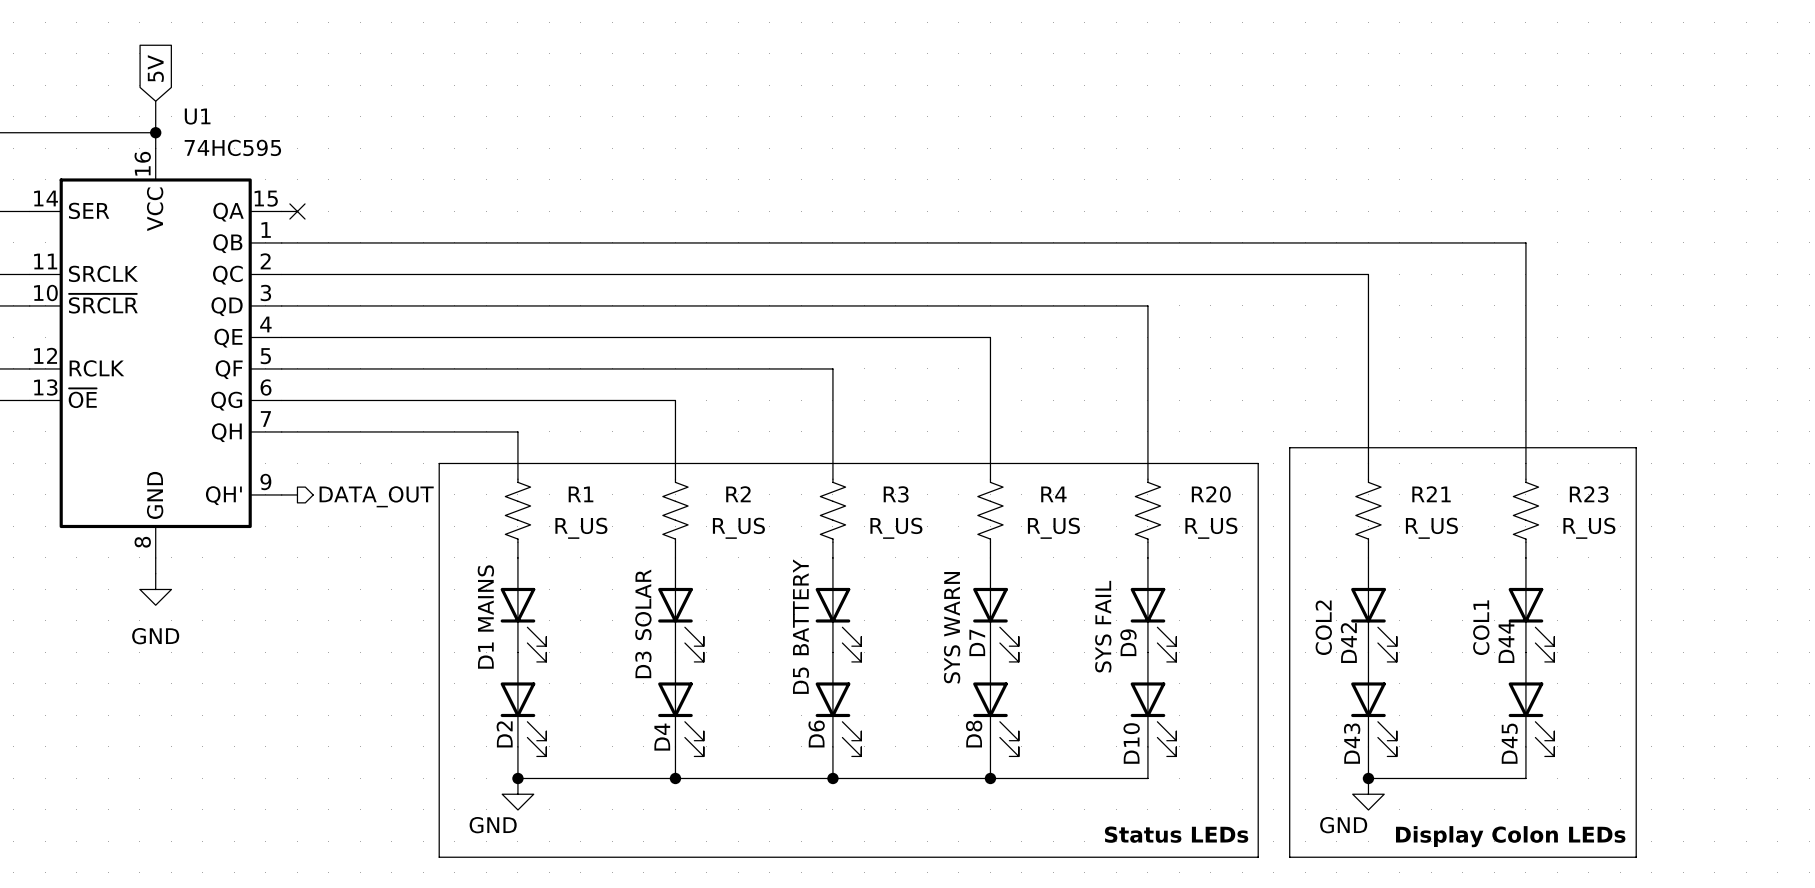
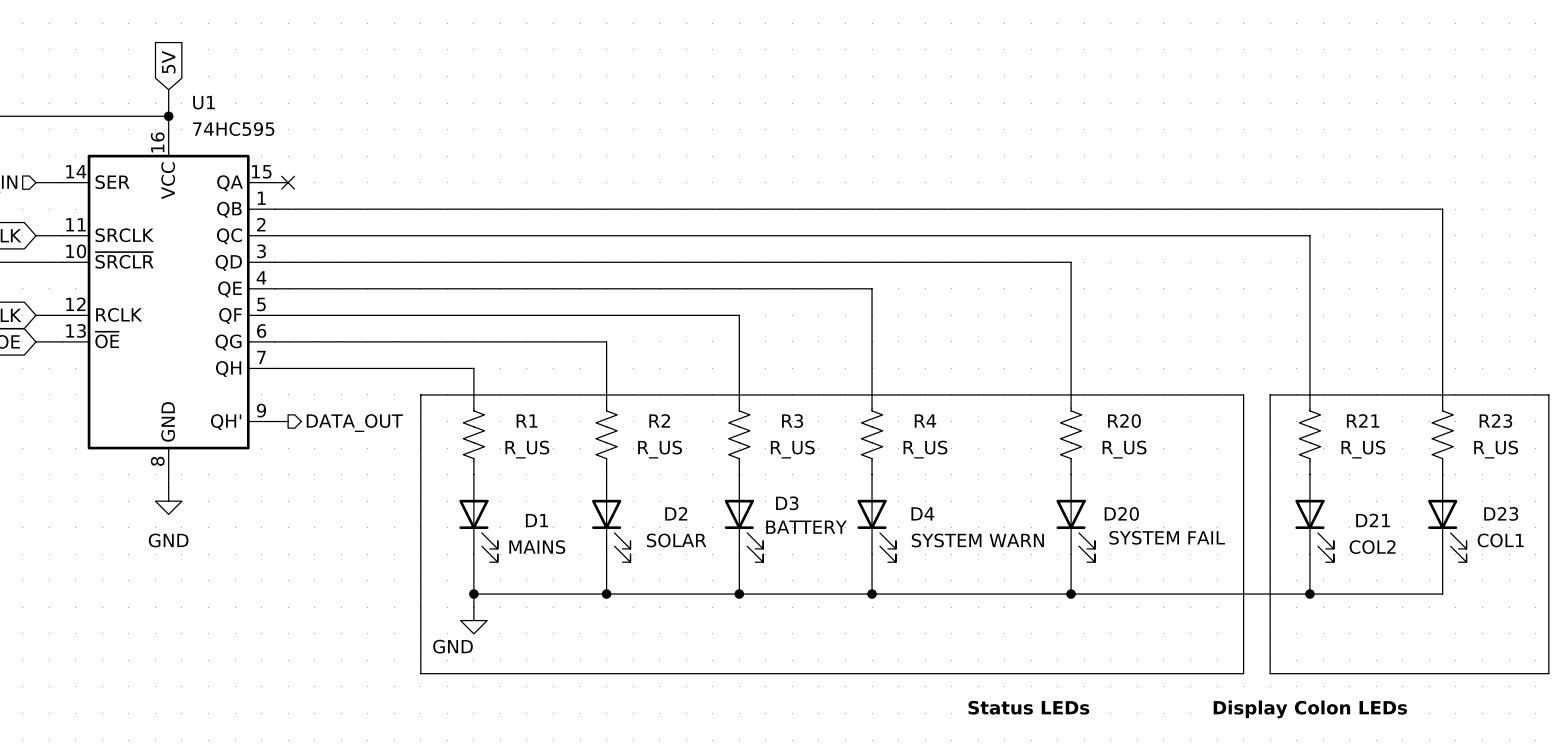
wire: (1525, 242) (1525, 463) -> (1323, 209) (1442, 209) (1442, 394)
wire: (1368, 274) (1368, 463) -> (1190, 235) (1309, 235) (1309, 394)
wire: (1147, 305) (1147, 463) -> (1004, 262) (1071, 262) (1071, 394)
line: (1289, 447) (1636, 447) (1636, 857) (1289, 857) (1289, 447) -> none
line: (454, 463) (439, 463) (439, 857) (1258, 857) (1258, 463) -> (420, 394) (420, 673) (1243, 673) (1243, 394) (1097, 394)
line: none -> (1270, 394) (1548, 394) (1548, 673) (1270, 673) (1270, 394)
R20 position: (1147, 510) -> (1071, 434)
R21 position: (1368, 510) -> (1309, 434)
R23 position: (1525, 510) -> (1442, 434)
D1 value rotation: 0° (485, 598) -> 90° clockwise (537, 547)
D1 value position: MAINS (485, 598) -> MAINS (537, 547)
D3 value rotation: 0° (643, 604) -> 90° clockwise (676, 540)
D3 value position: SOLAR (643, 604) -> SOLAR (676, 540)
D5 value rotation: 0° (800, 607) -> 90° clockwise (806, 527)
D9: SYS FAIL (1153, 609) -> none
D20: none -> SYSTEM FAIL (1075, 518)
D42: COL2 (1373, 609) -> none
D21: none -> COL2 (1314, 518)
D44: COL1 (1531, 609) -> none
D23: none -> COL1 (1447, 518)
D7 value: SYS WARN (952, 627) -> SYSTEM WARN (977, 540)
D7 name: D7 (977, 642) -> D4 (922, 513)
wire: none -> (1071, 554) (1071, 594)
wire: none -> (1309, 554) (1309, 594)
wire: none -> (1442, 554) (1442, 594) (473, 594)
D1 name rotation: 0° (485, 655) -> 90° clockwise (536, 520)
D1 name position: D1 (485, 655) -> D1 (536, 520)
D3 name: D3 (643, 664) -> D2 (676, 513)
D5 name: D5 (801, 680) -> D3 (787, 503)
junction: none -> (473, 594)
junction: none -> (606, 594)
junction: none -> (739, 594)
junction: none -> (872, 594)
junction: none -> (1071, 594)
junction: none -> (1309, 594)
D2: (523, 704) -> none
D4: (680, 704) -> none
D6: (838, 704) -> none
D8: (995, 704) -> none
D10: (1153, 704) -> none
D43: (1373, 704) -> none
D45: (1531, 704) -> none
wire: (517, 746) (517, 778) (1147, 778) (1147, 746) -> none
wire: (675, 746) (675, 778) -> none
wire: (832, 746) (832, 778) -> none
wire: (990, 746) (990, 778) -> none
wire: (1368, 746) (1368, 778) (1525, 778) (1525, 746) -> none
junction: (517, 778) -> none
junction: (675, 778) -> none
junction: (832, 778) -> none
junction: (990, 778) -> none
junction: (1368, 778) -> none
power symbol position: GND (517, 794) -> GND (473, 620)
power symbol: GND (1368, 794) -> none

